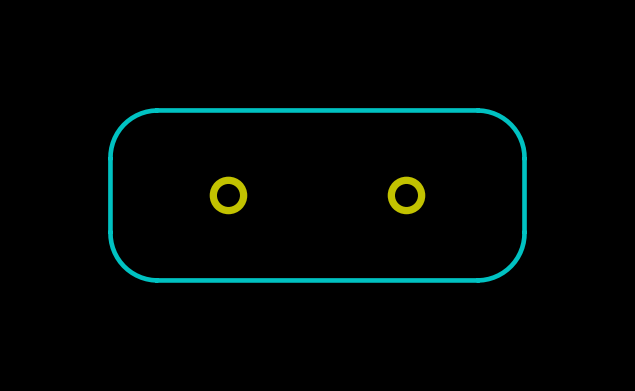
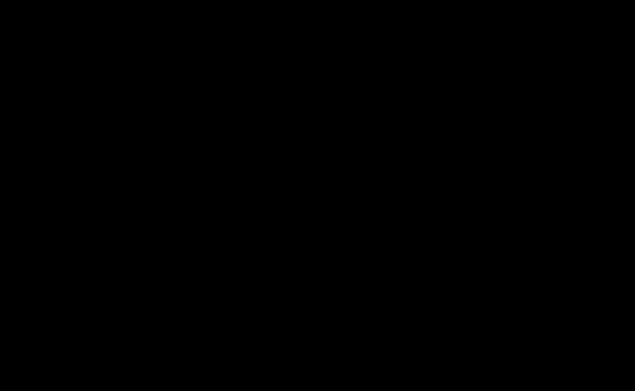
part: (317, 195) -> none

